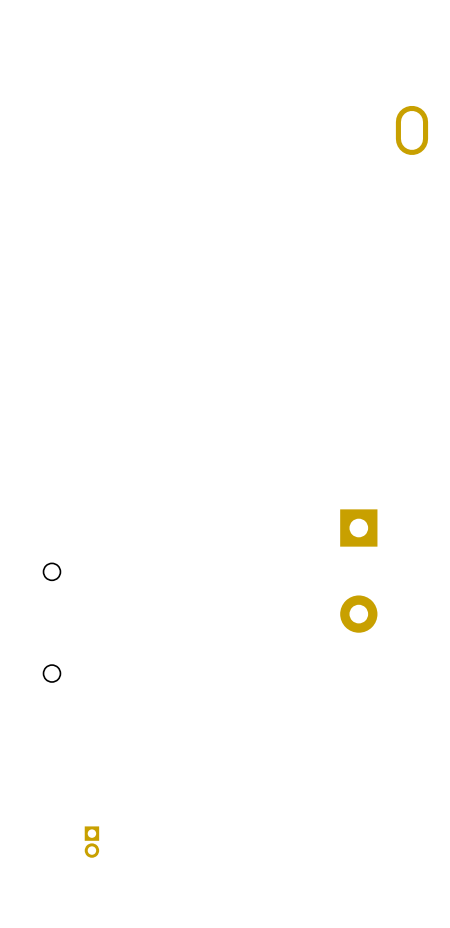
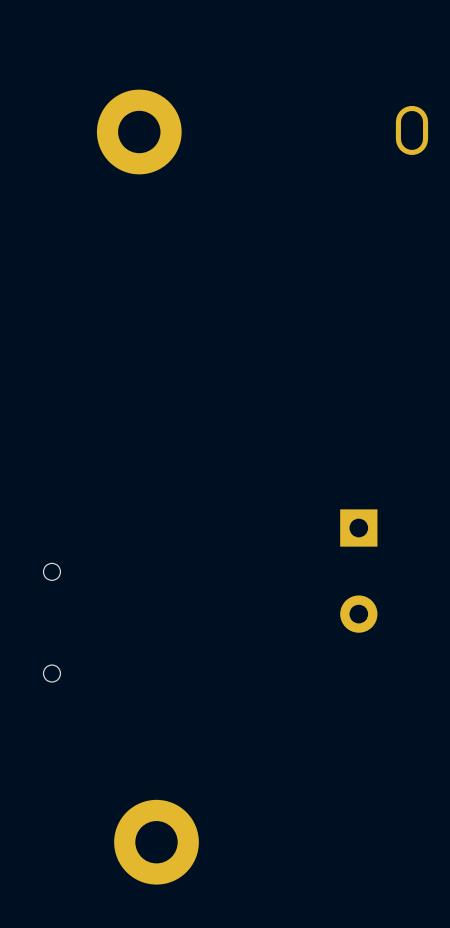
part: none -> (139, 132)
part: (91, 842) -> none
part: none -> (156, 842)

